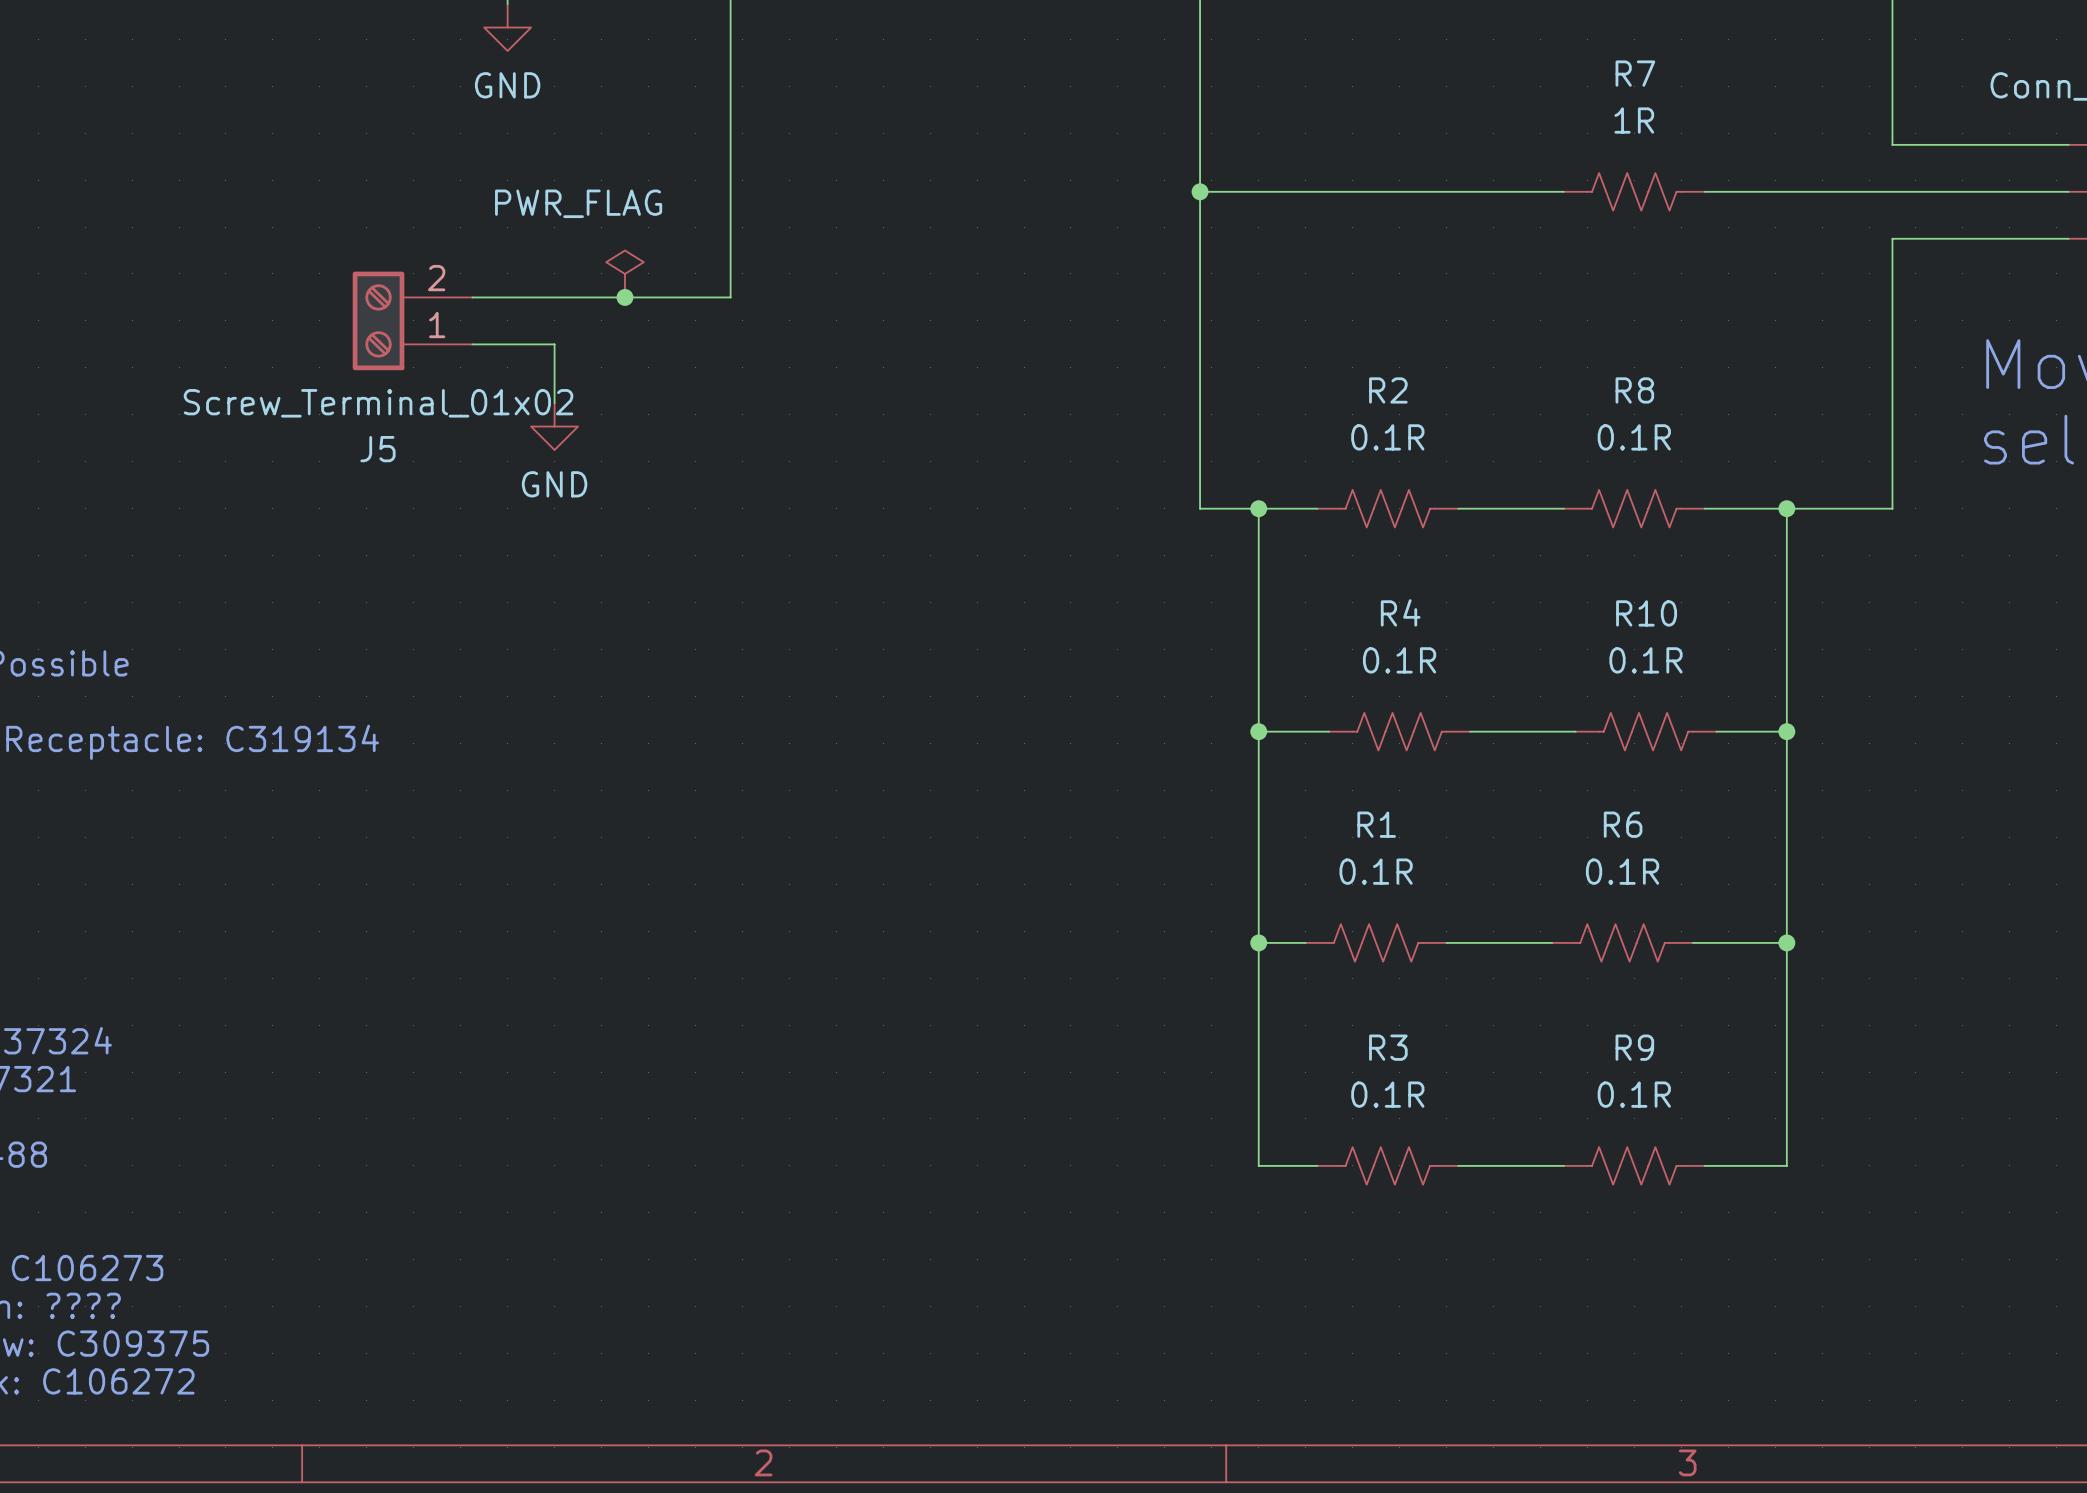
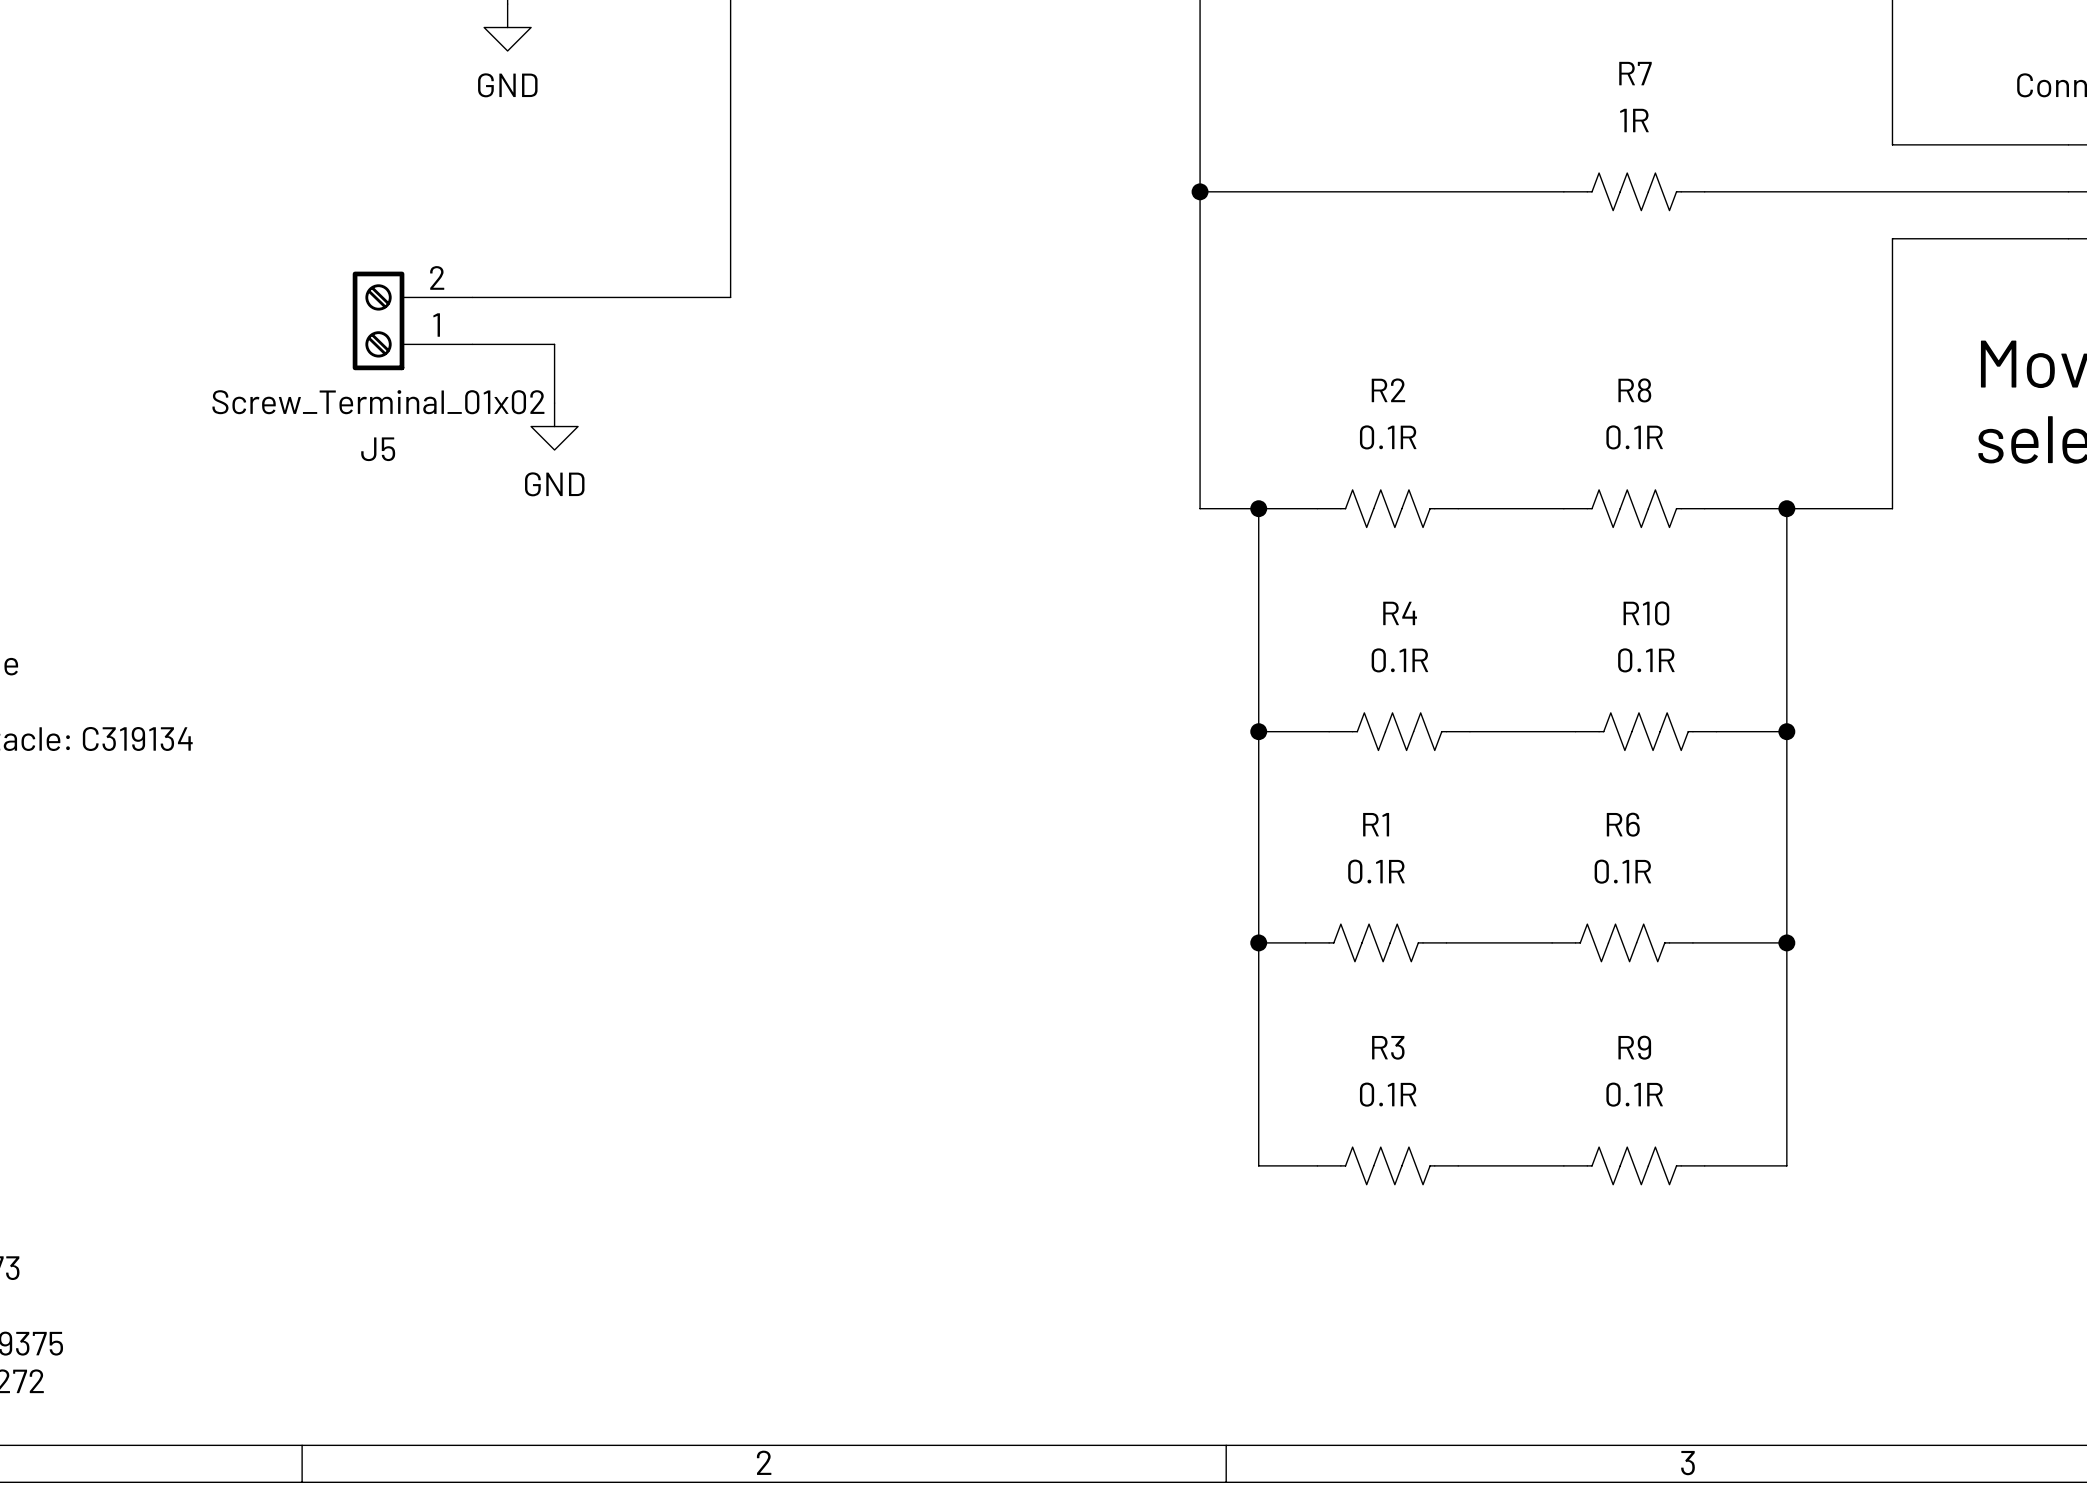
power symbol: PWR_FLAG (624, 273) -> none
junction: (624, 297) -> none

